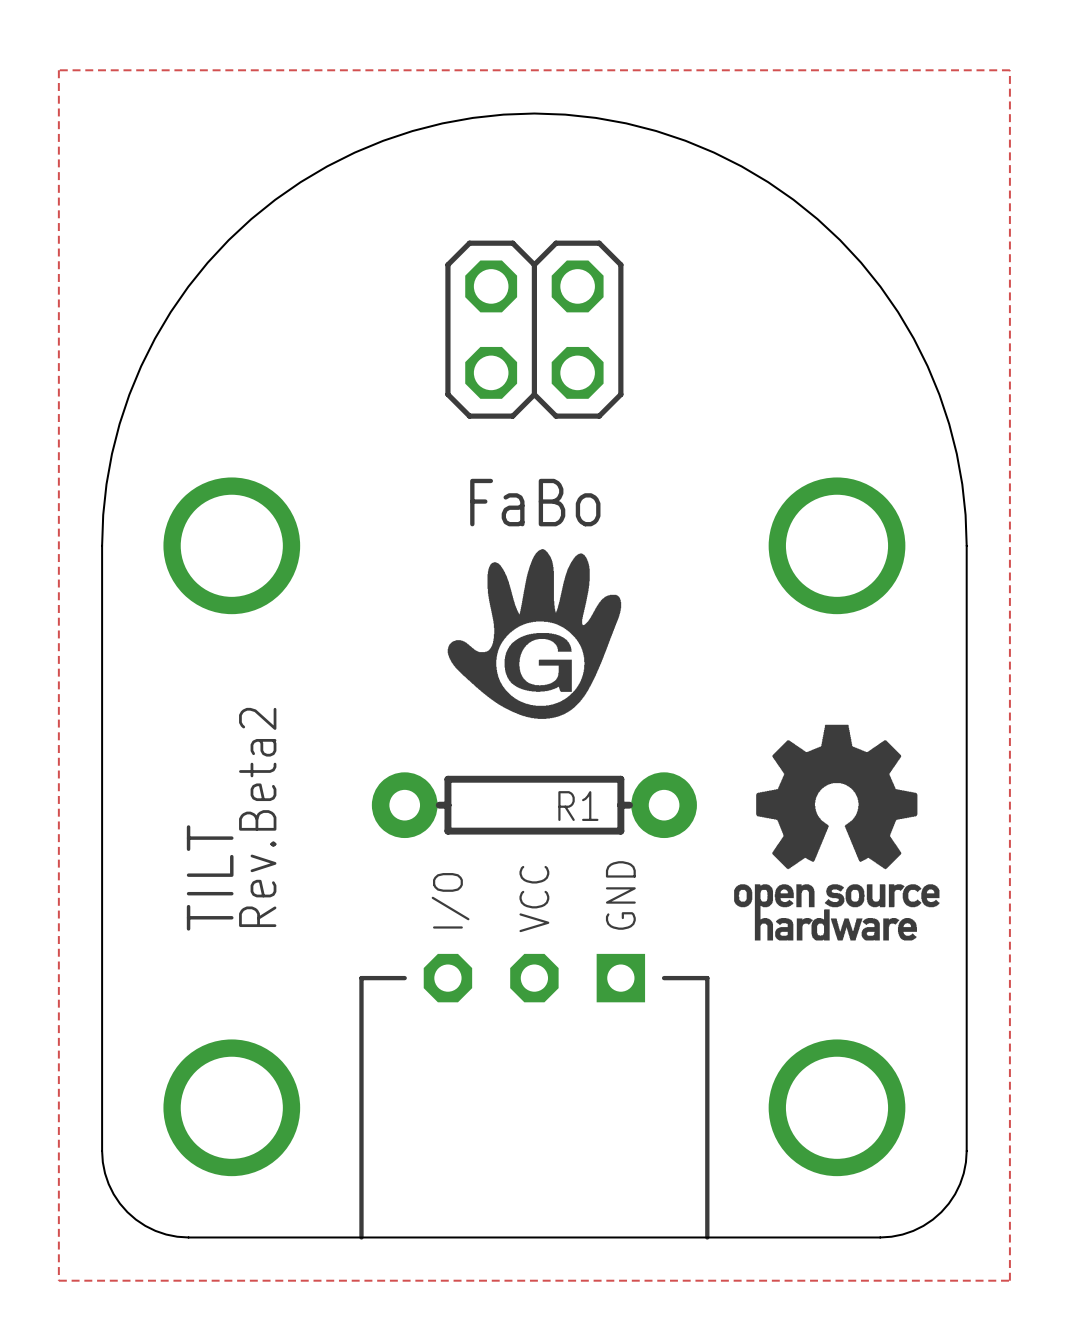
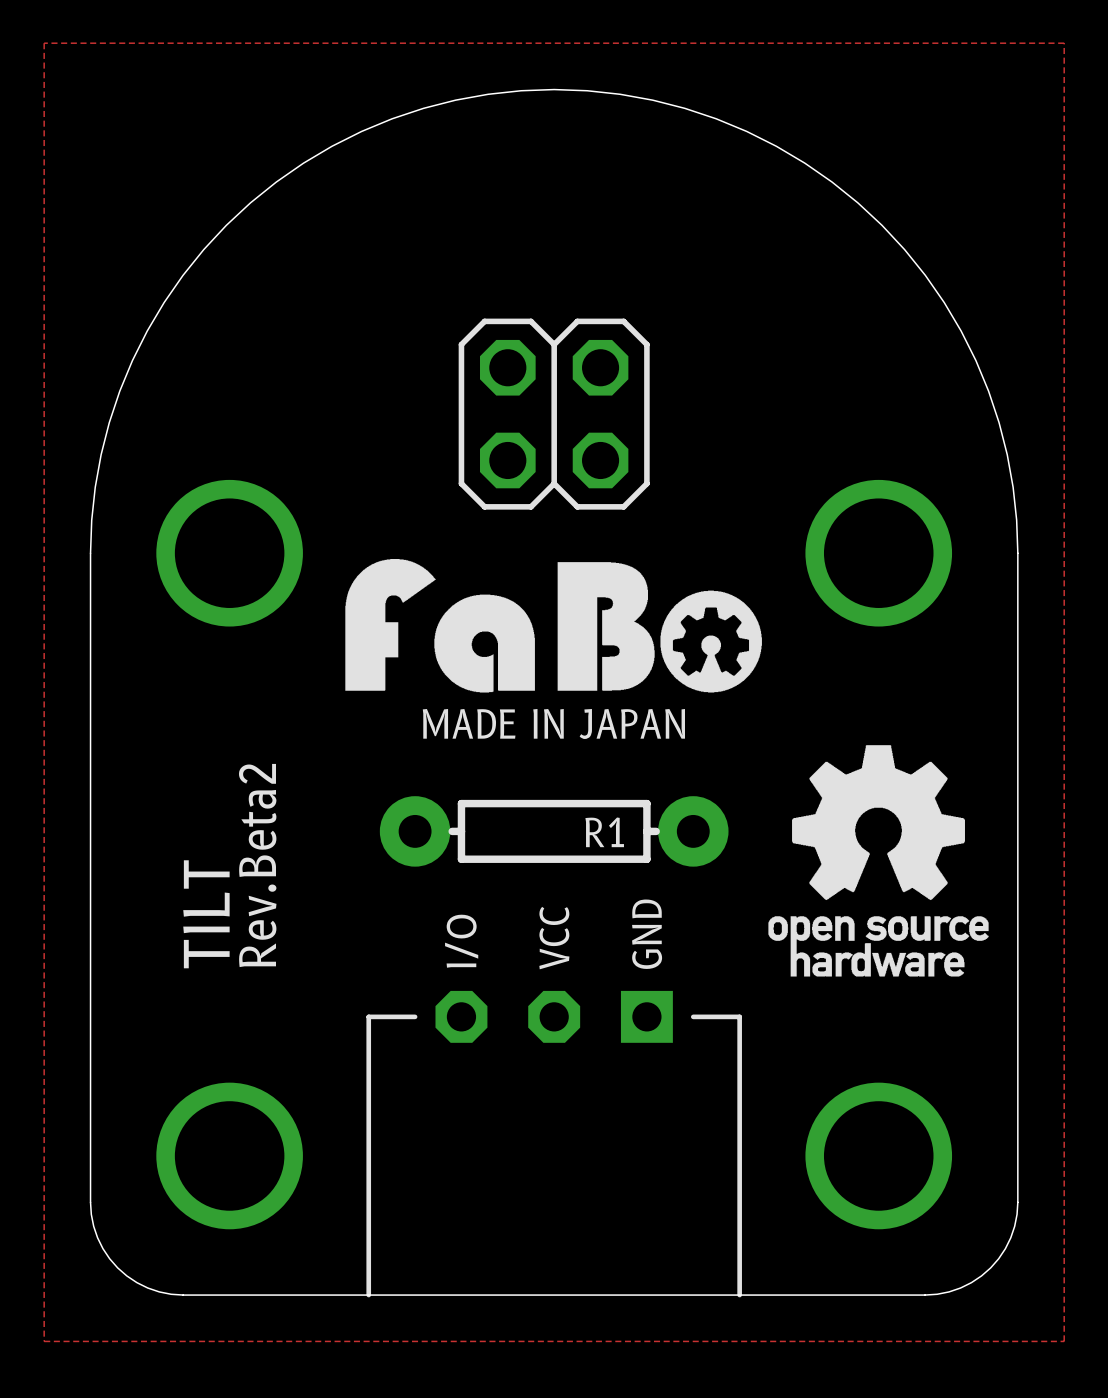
part position: (534, 329) -> (554, 414)
drawing shape: [447, 478, 622, 719] -> [345, 559, 762, 693]
text: none -> MADE IN JAPAN (553, 724)

